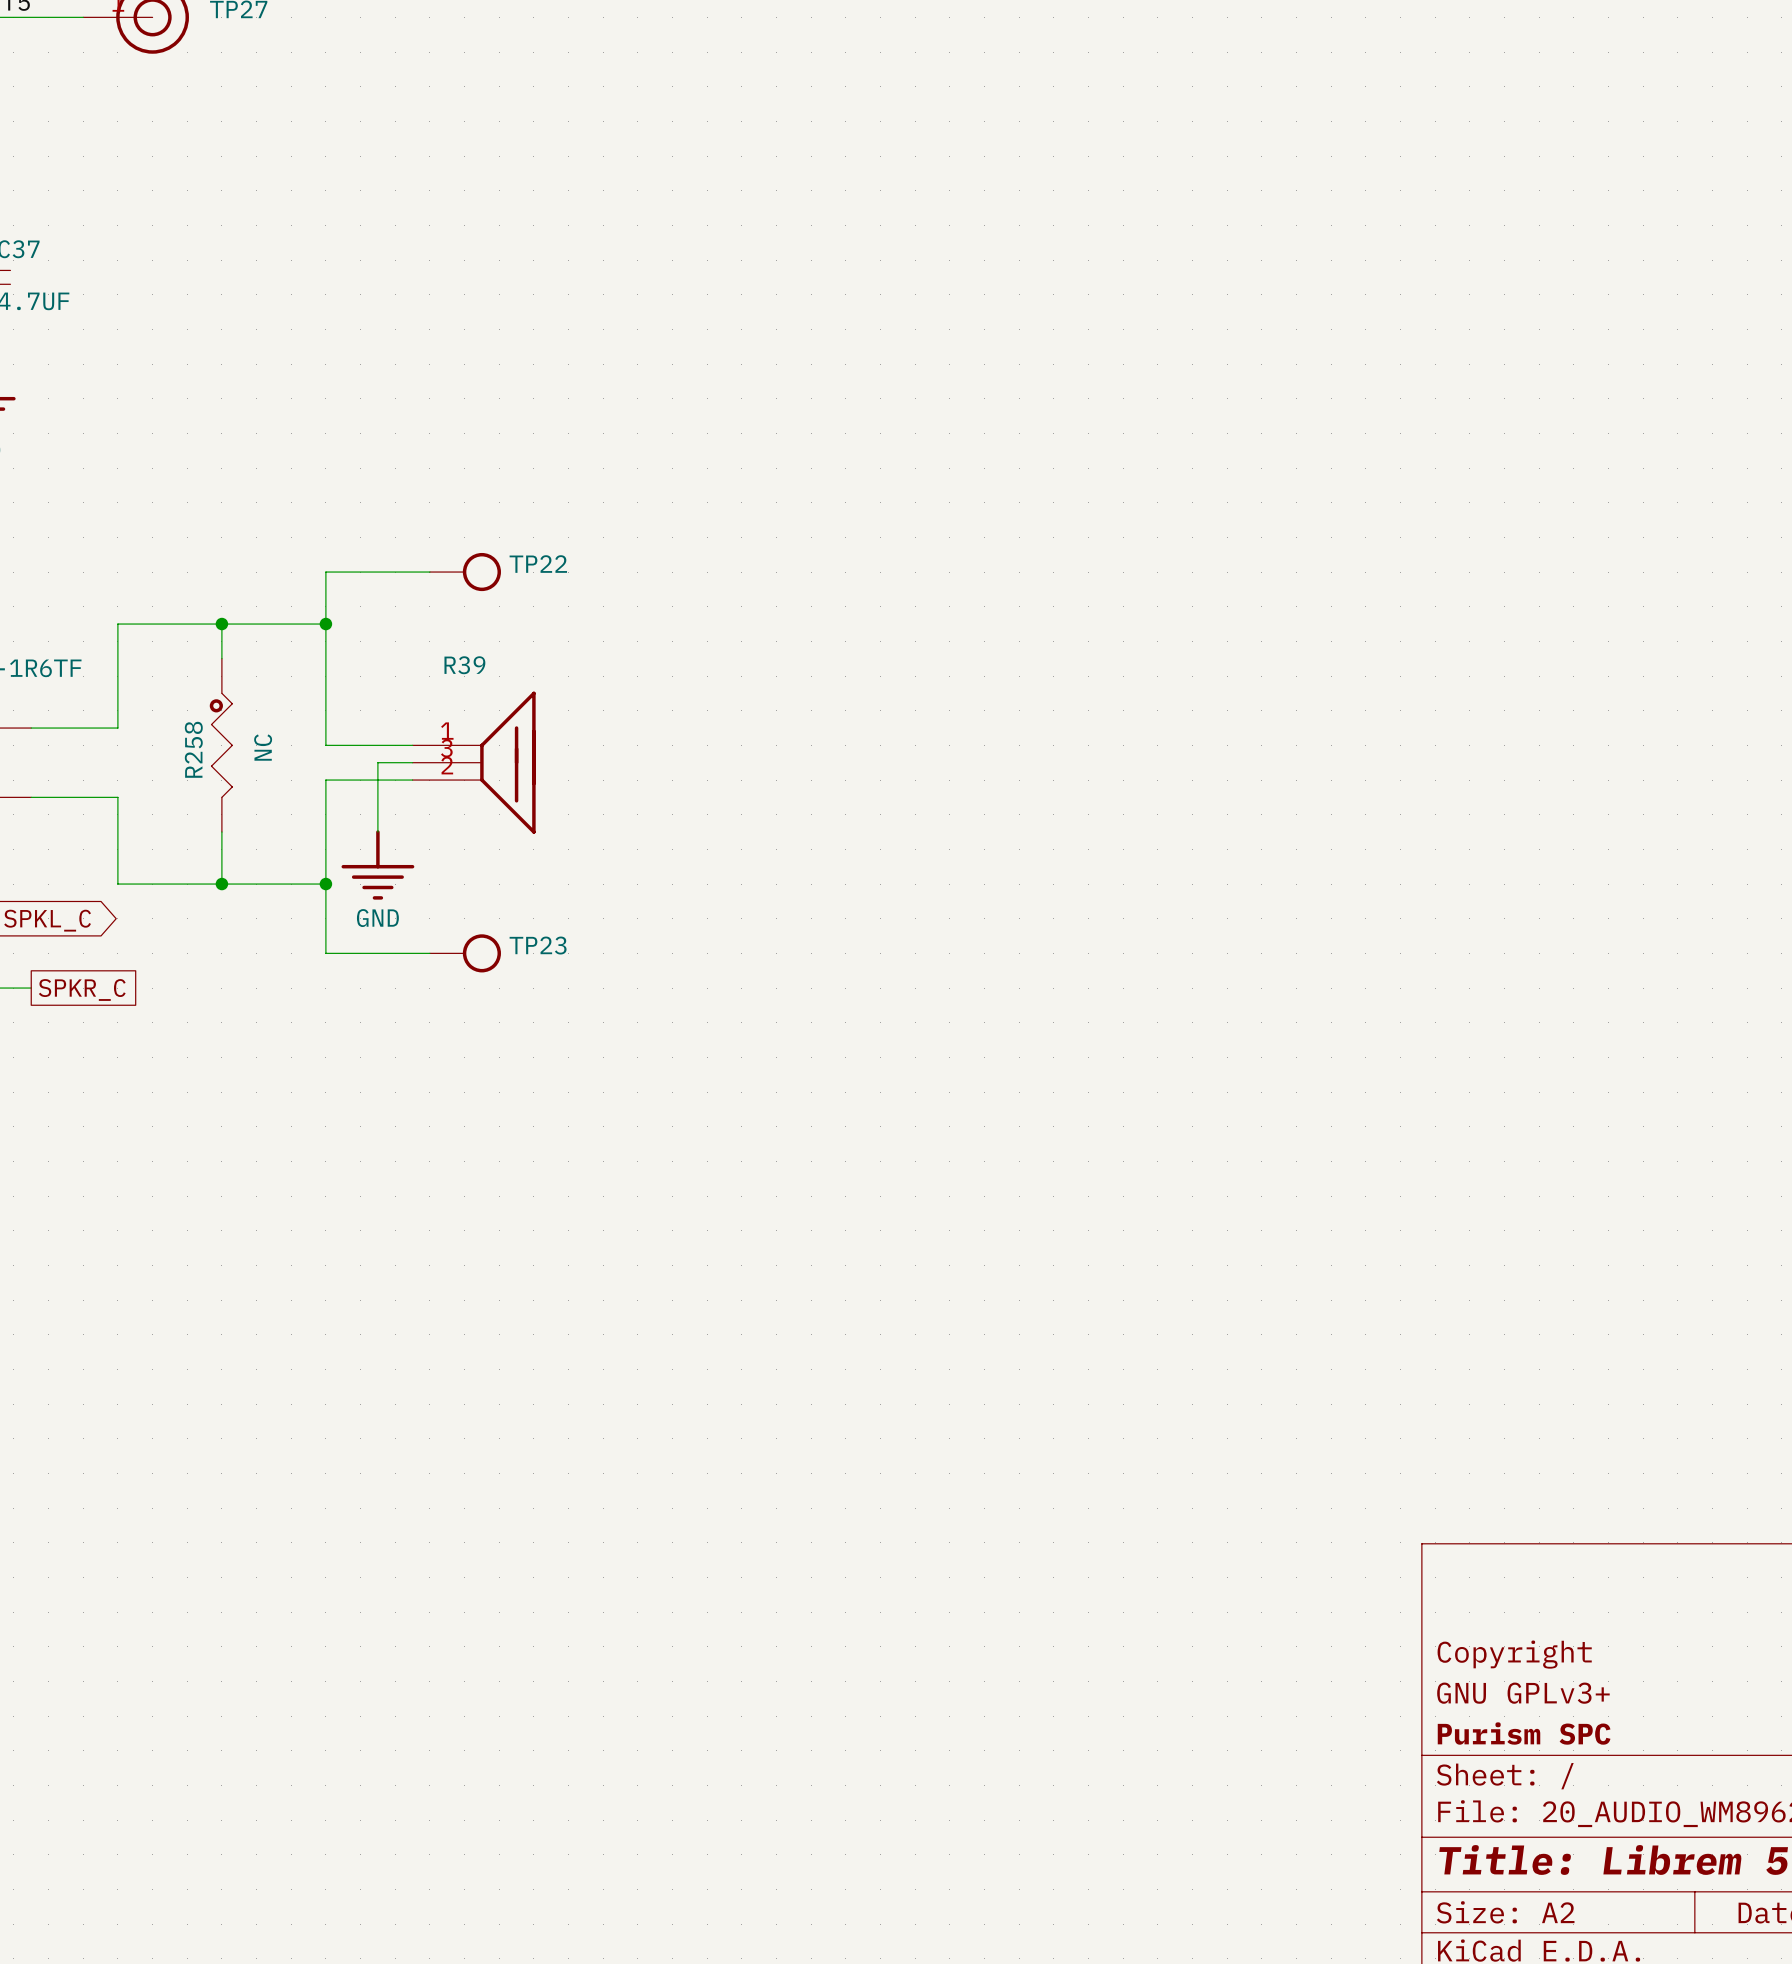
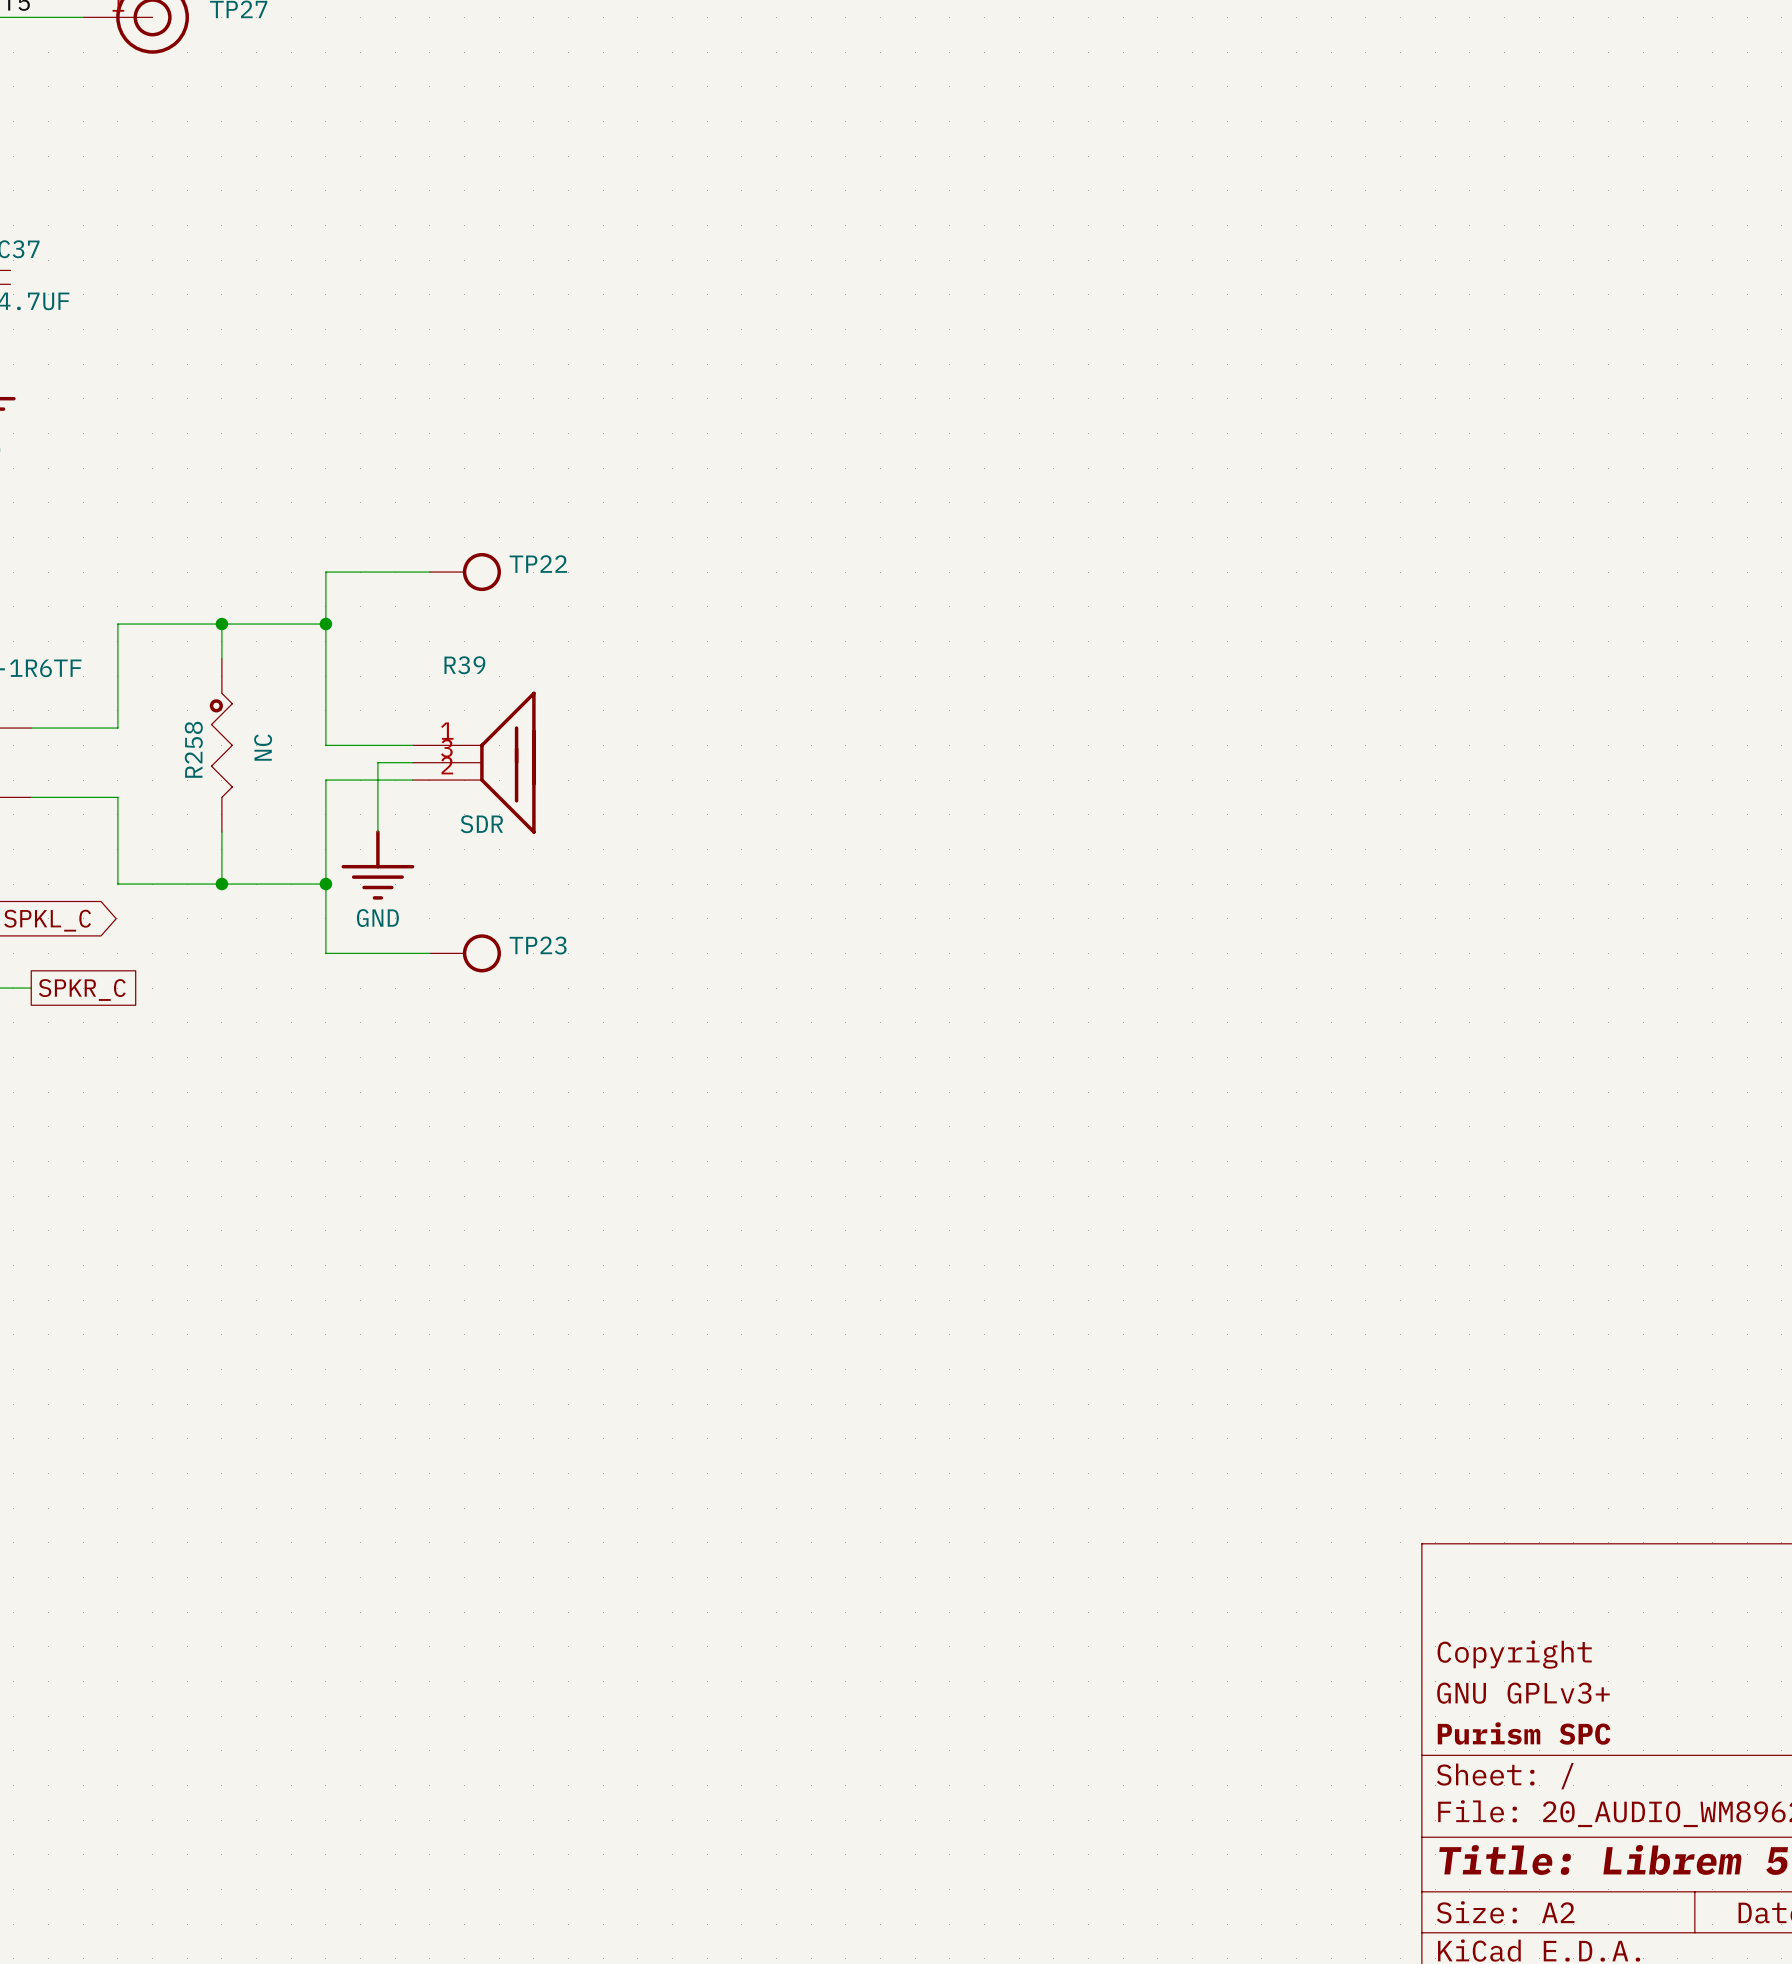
R39 value: none -> SDR (481, 824)

